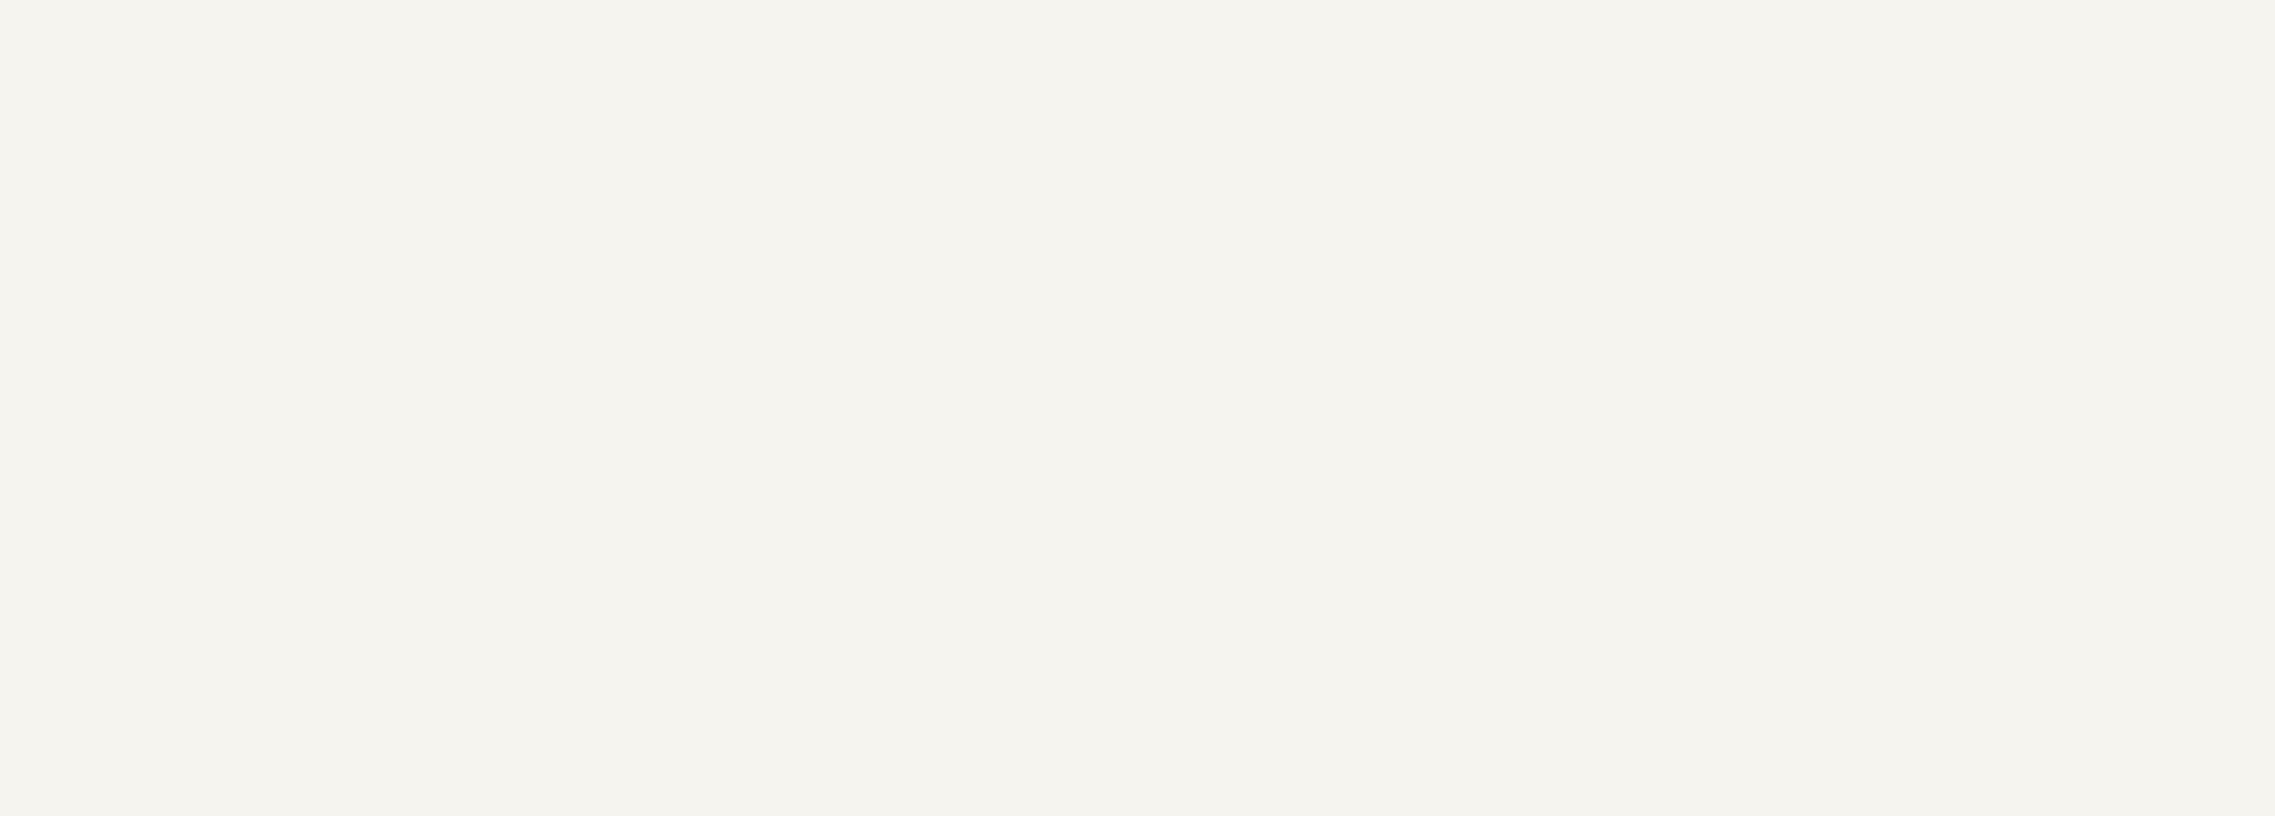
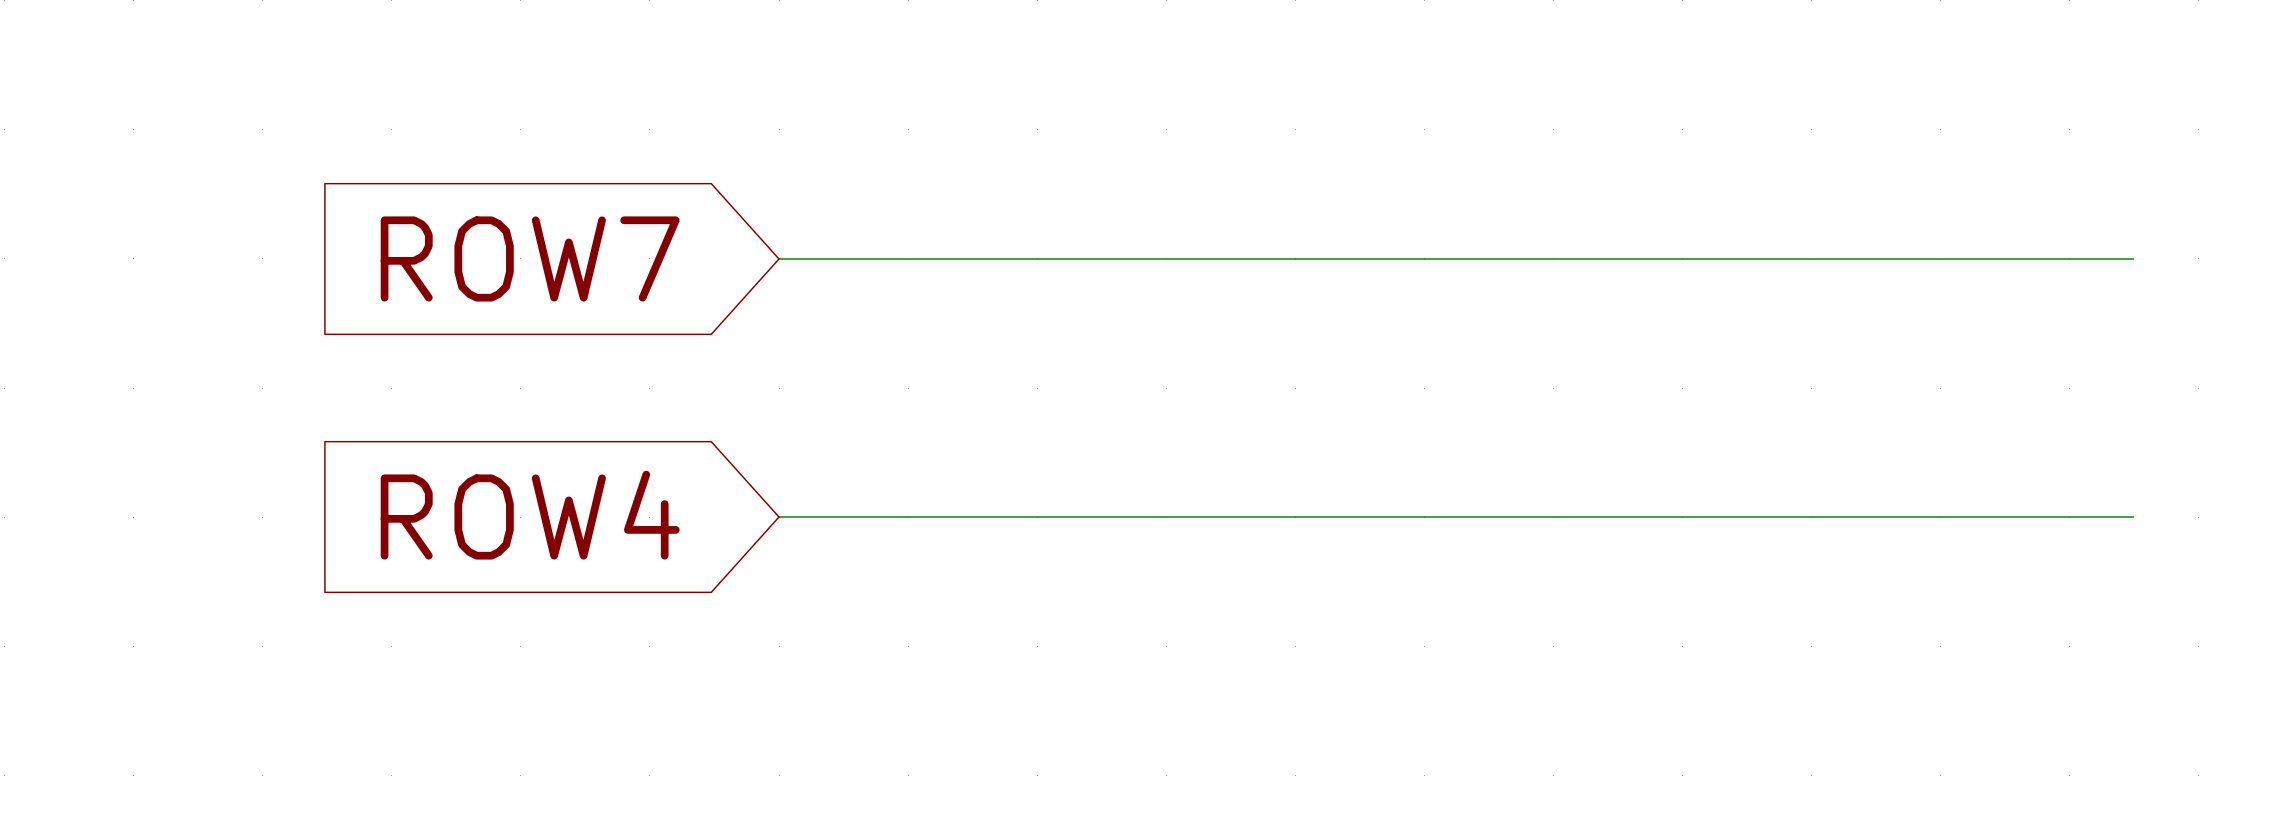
global label: none -> ROW7 (530, 258)
wire: none -> (779, 258) (2133, 258)
global label: none -> ROW4 (530, 515)
wire: none -> (779, 517) (2133, 517)

